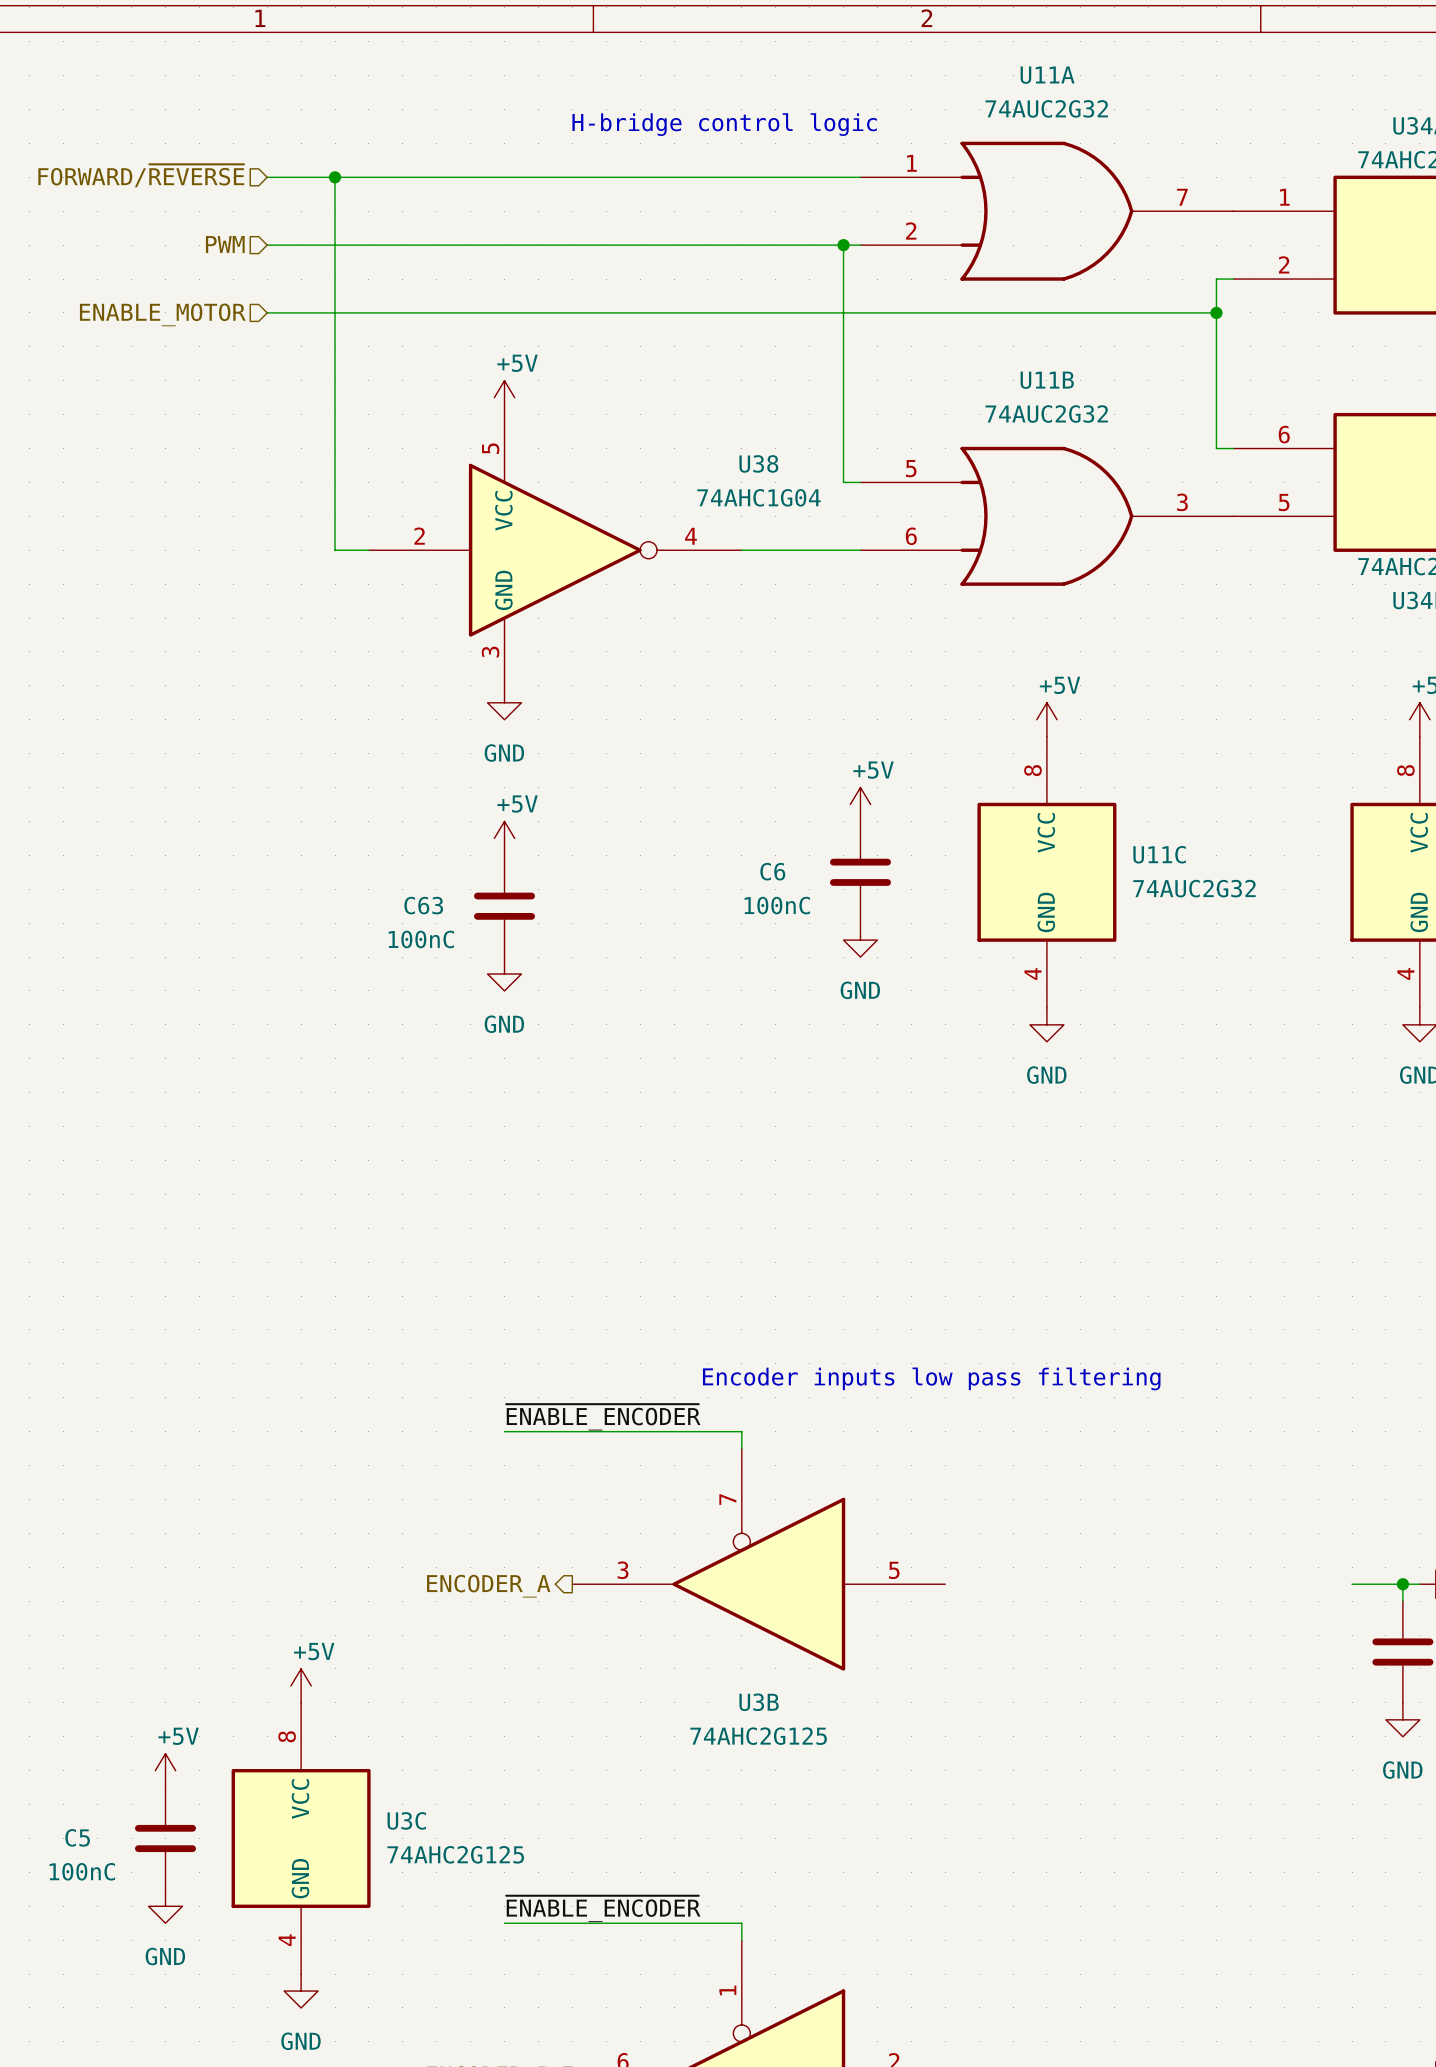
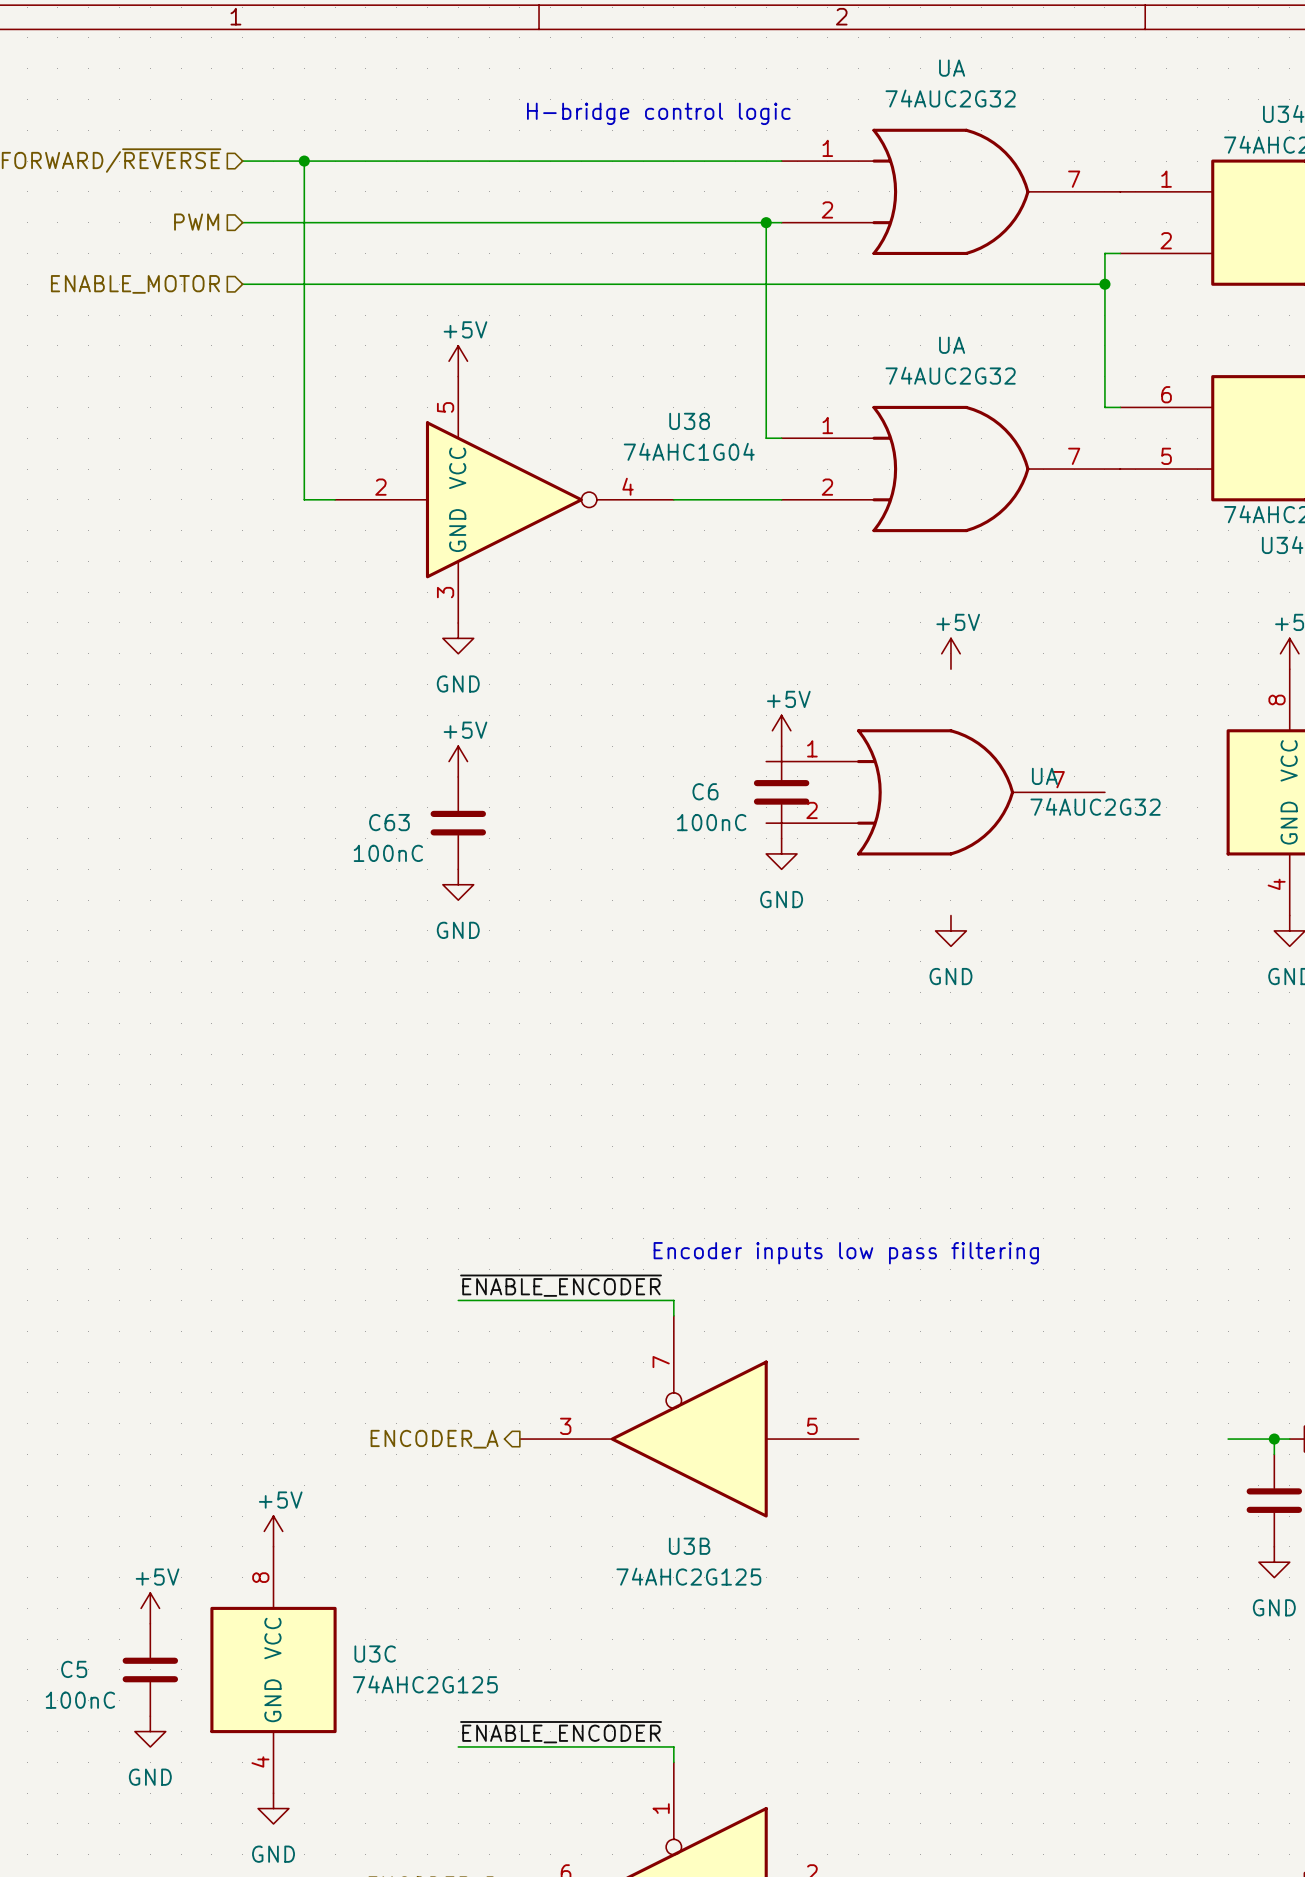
U11A name: U11A (1047, 75) -> UA (952, 68)
U11B name: U11B (1047, 380) -> UA (952, 345)
U11B pin number: 5 (911, 468) -> 1 (827, 425)
U11B pin number: 3 (1182, 502) -> 7 (1074, 456)
U11B pin number: 6 (911, 536) -> 2 (827, 487)
UA: none -> 74AUC2G32 (935, 792)
U11C: 74AUC2G32 (1046, 872) -> none

